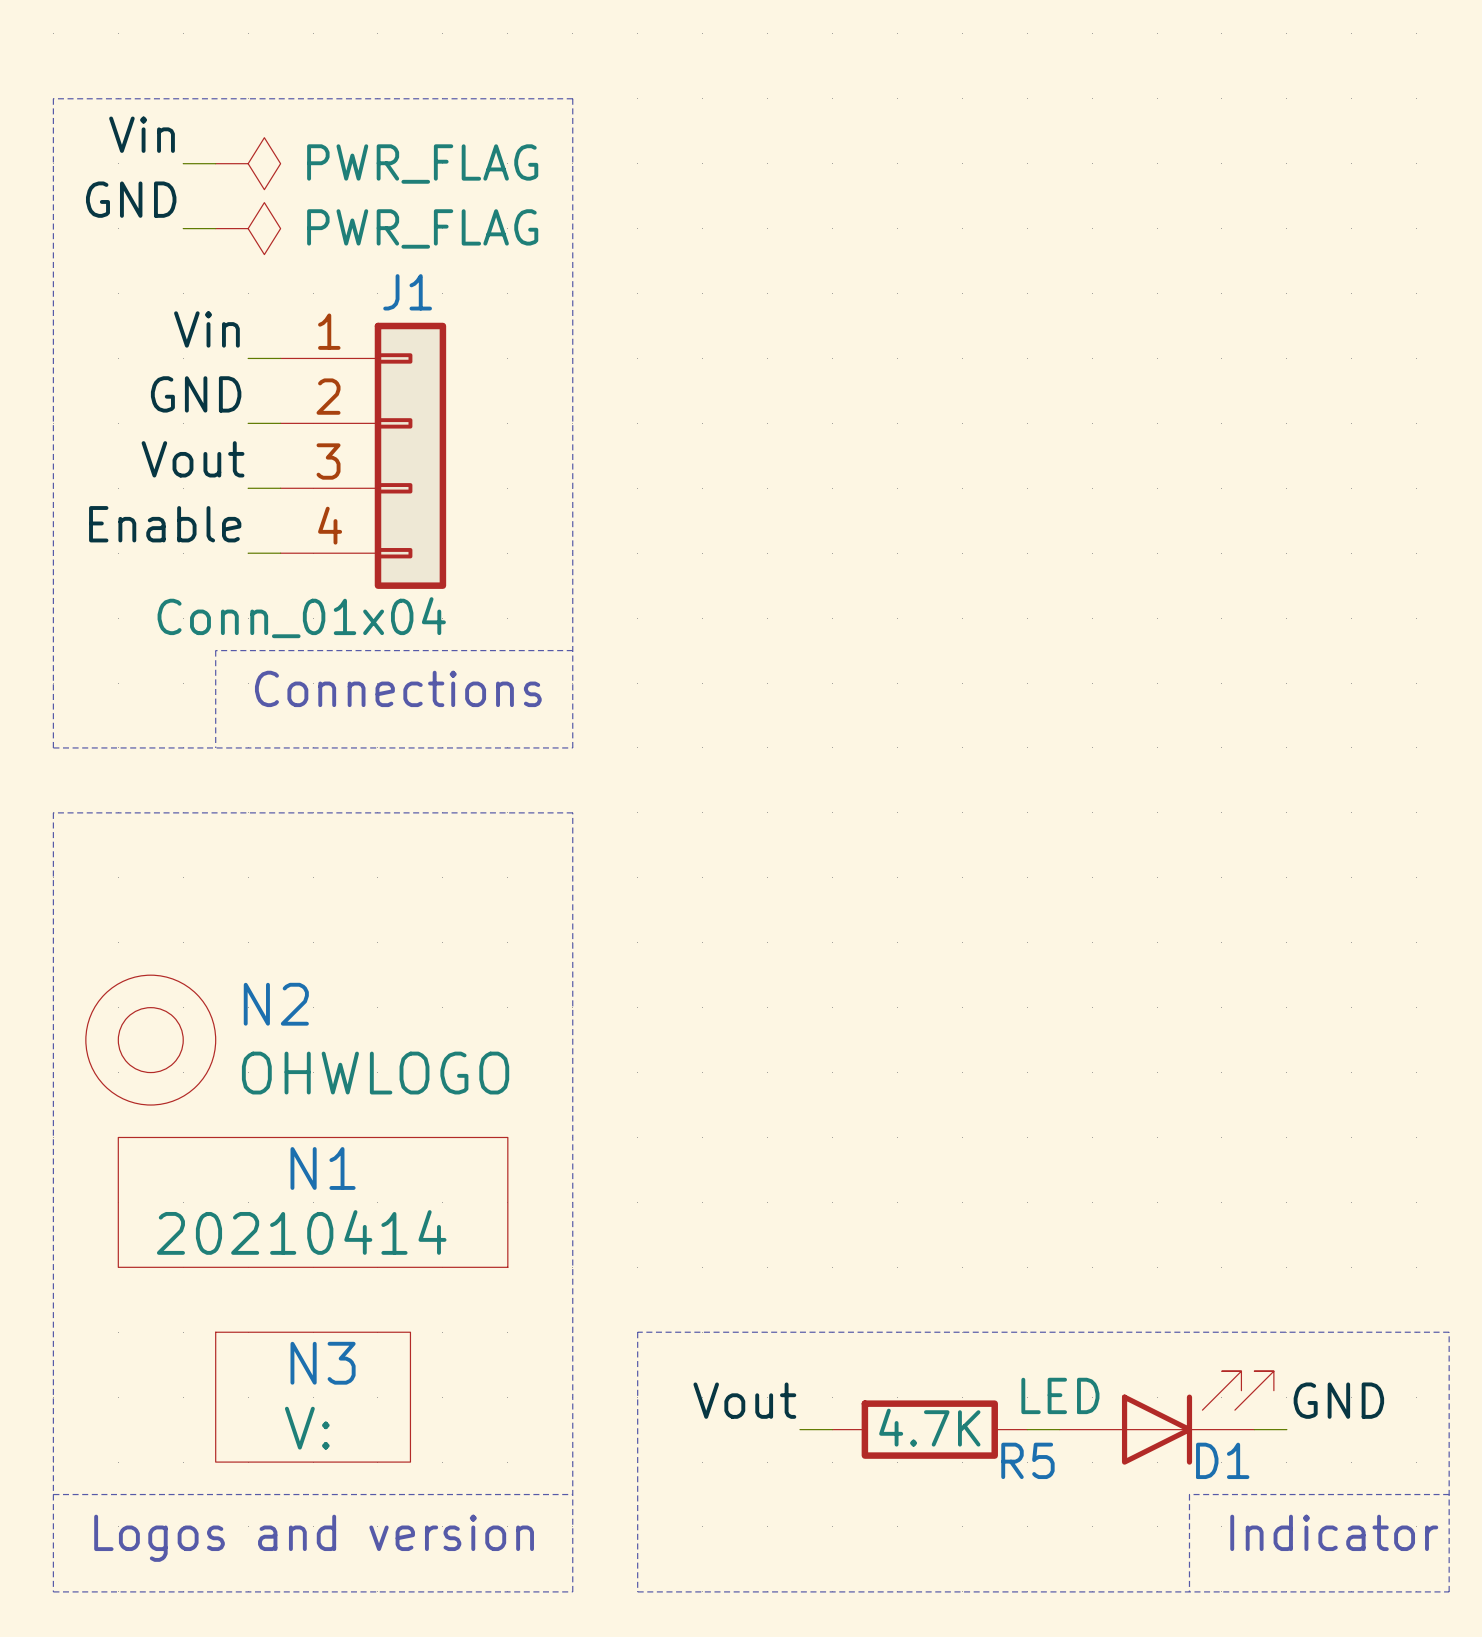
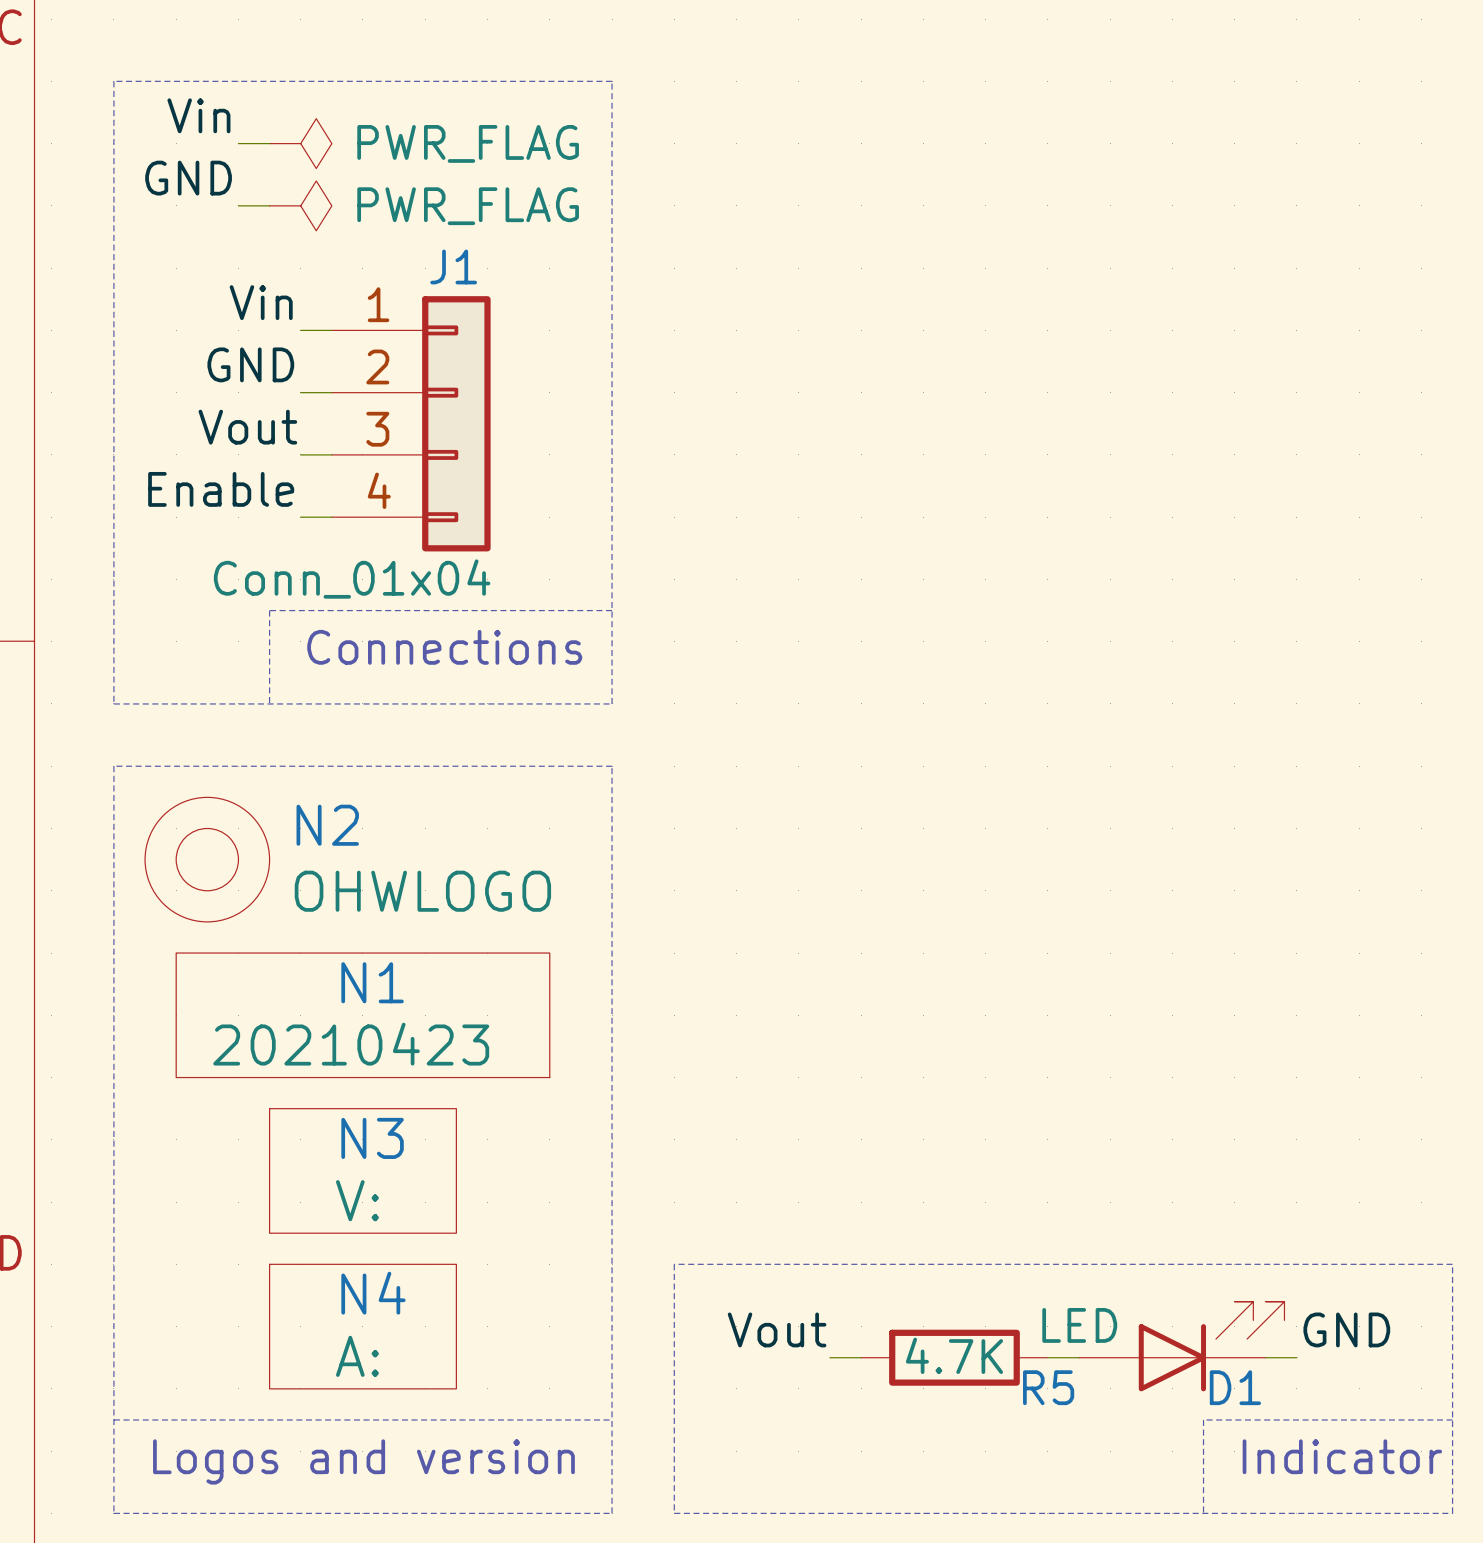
N2 position: (150, 1040) -> (207, 859)
N1 position: (313, 1202) -> (362, 1015)
N1 value: 20210414 (301, 1232) -> 20210423 (351, 1044)
N3: none -> V: (362, 1170)
N3 name: N3 (323, 1363) -> N4 (373, 1293)
N3 value: V: (307, 1428) -> A: (357, 1356)

